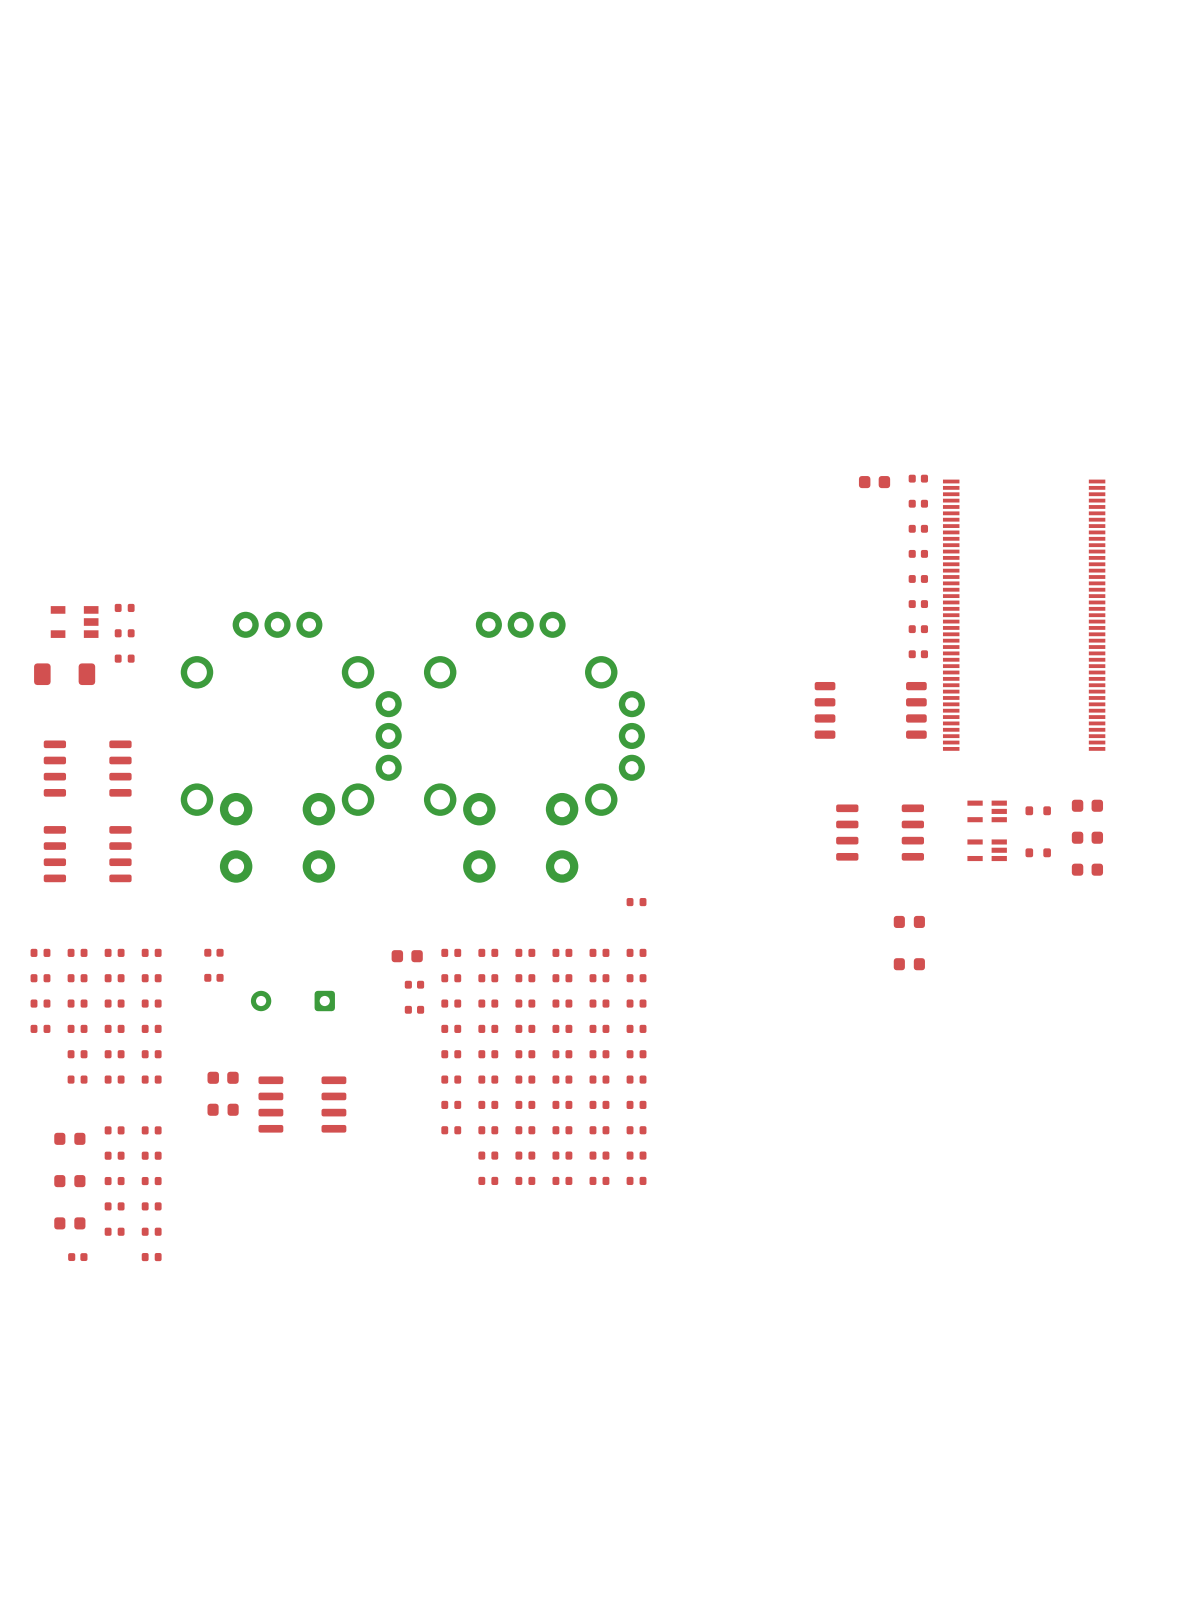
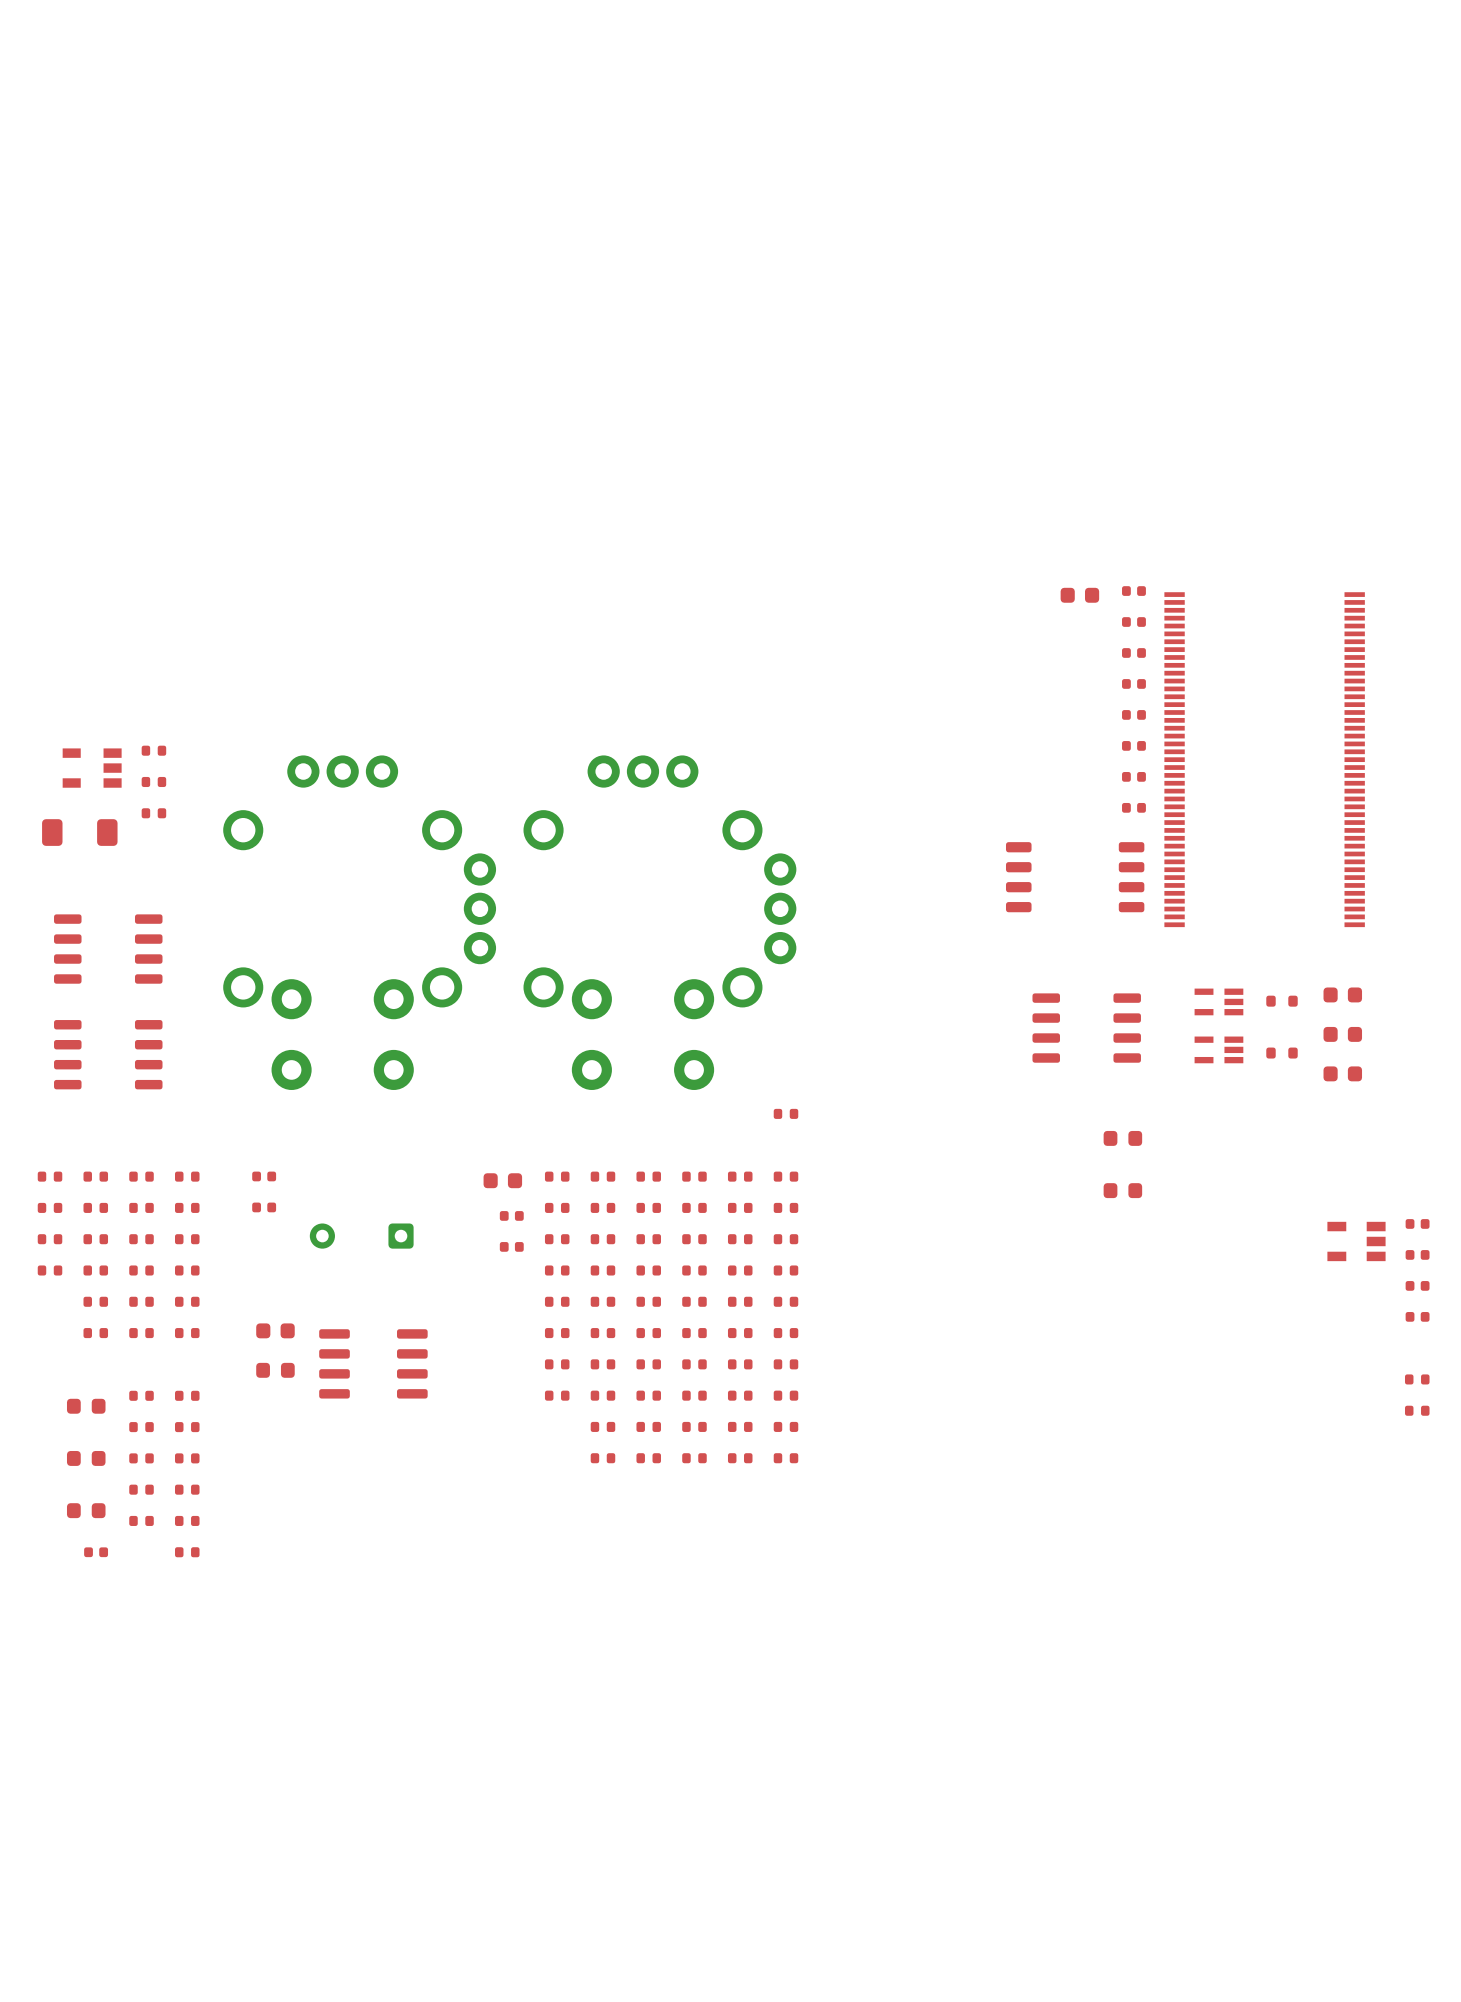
part: none -> (1417, 1223)
part: none -> (1356, 1241)
part: none -> (1417, 1254)
part: none -> (1417, 1285)
part: none -> (1417, 1316)
part: none -> (1417, 1379)
part: none -> (1417, 1410)

